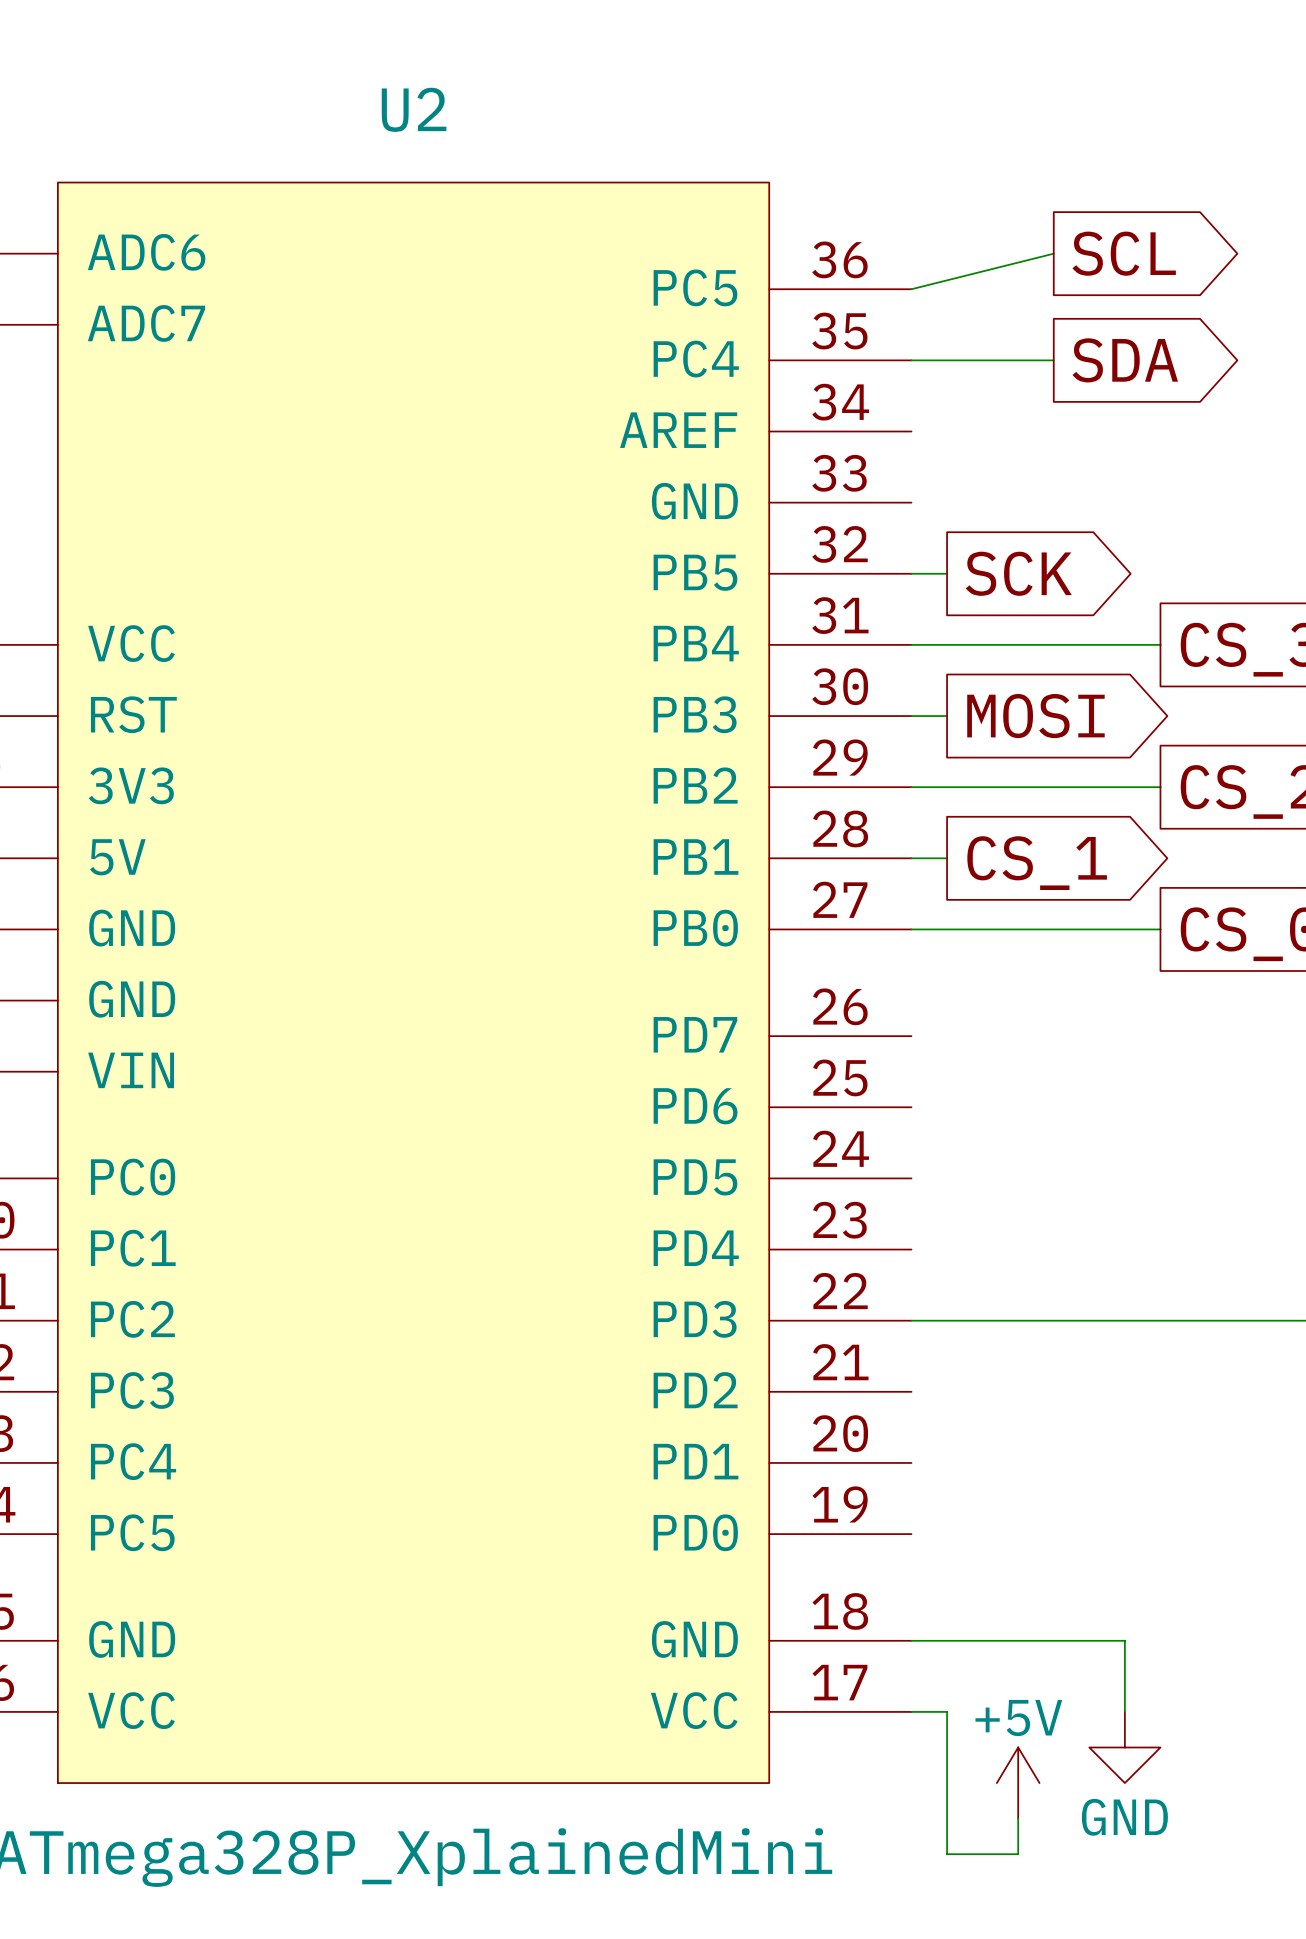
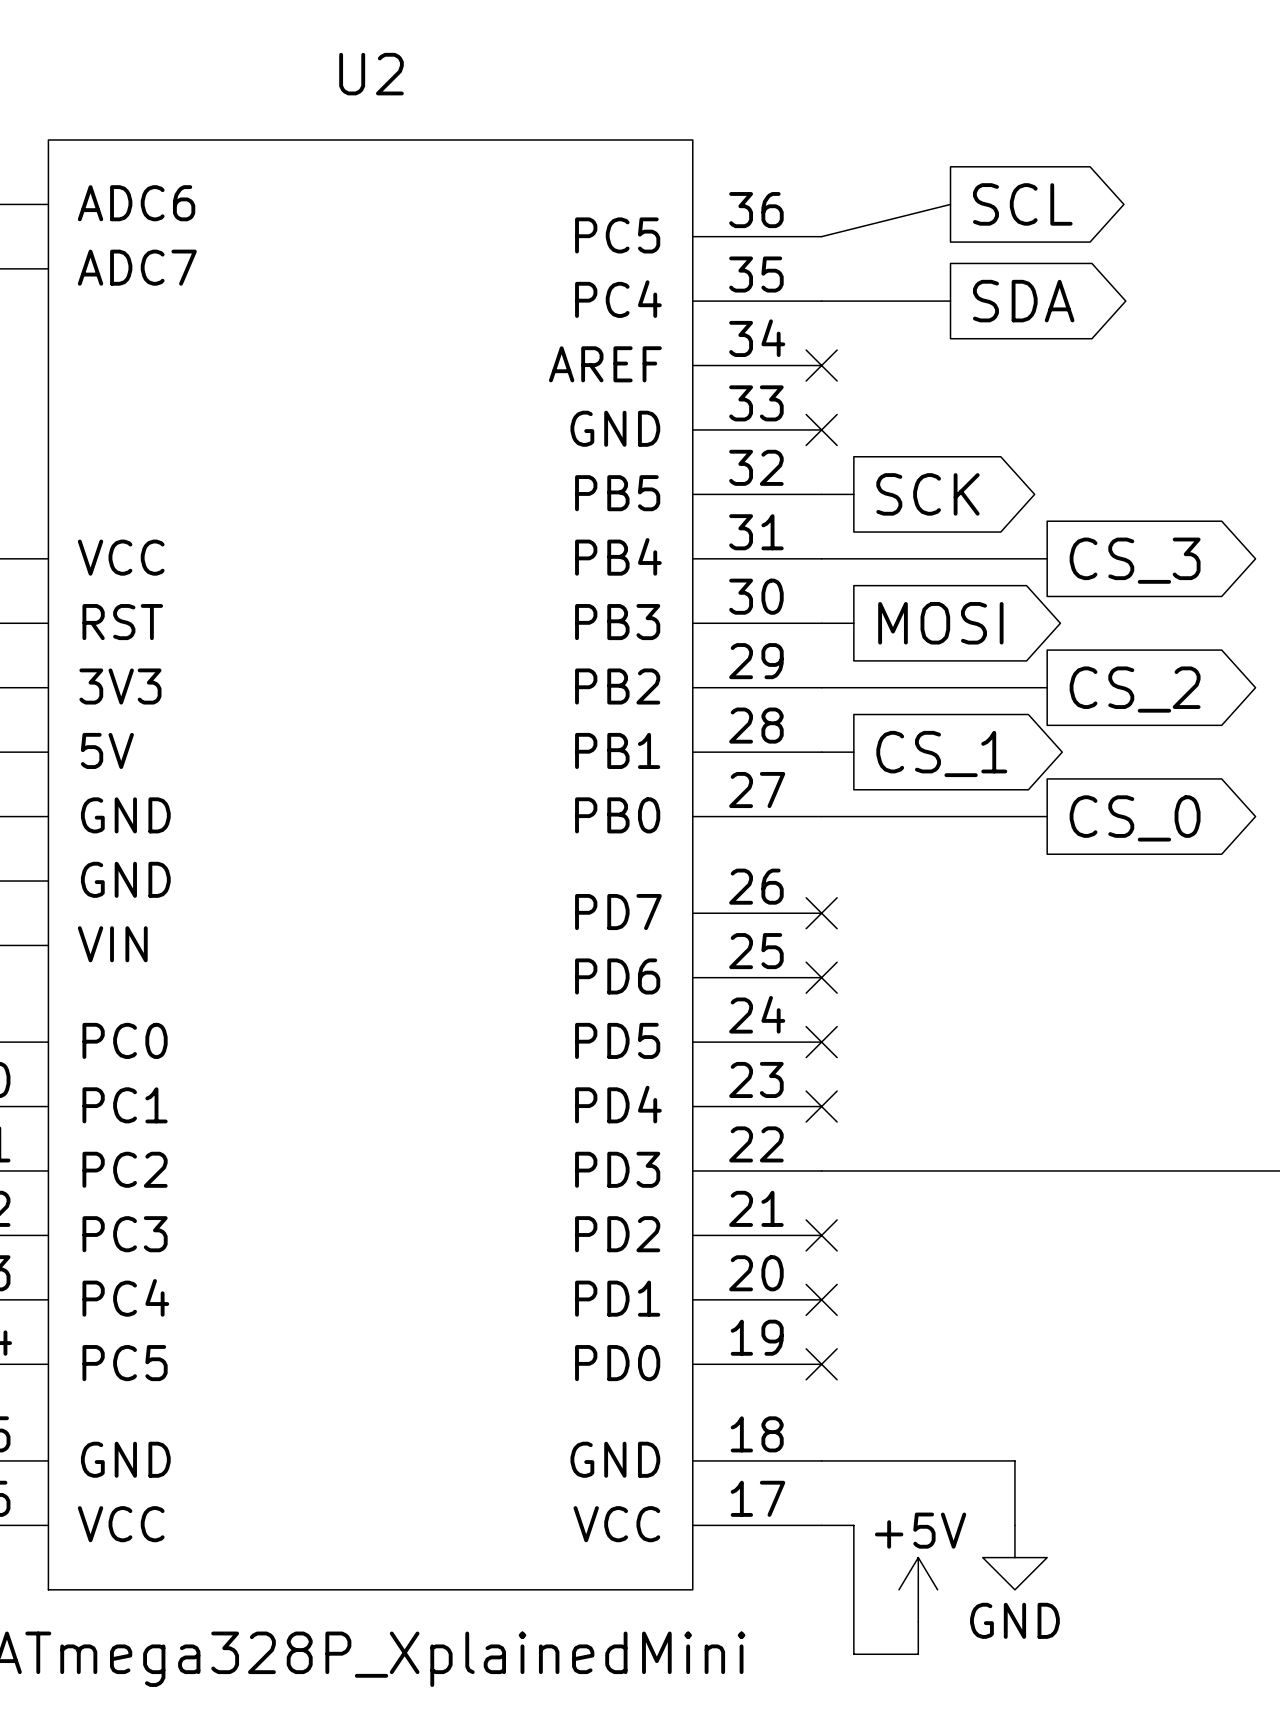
no-connect mark: none -> (821, 365)
no-connect mark: none -> (821, 429)
no-connect mark: none -> (821, 913)
no-connect mark: none -> (821, 977)
no-connect mark: none -> (821, 1042)
no-connect mark: none -> (821, 1106)
no-connect mark: none -> (821, 1235)
no-connect mark: none -> (821, 1299)
no-connect mark: none -> (821, 1364)

